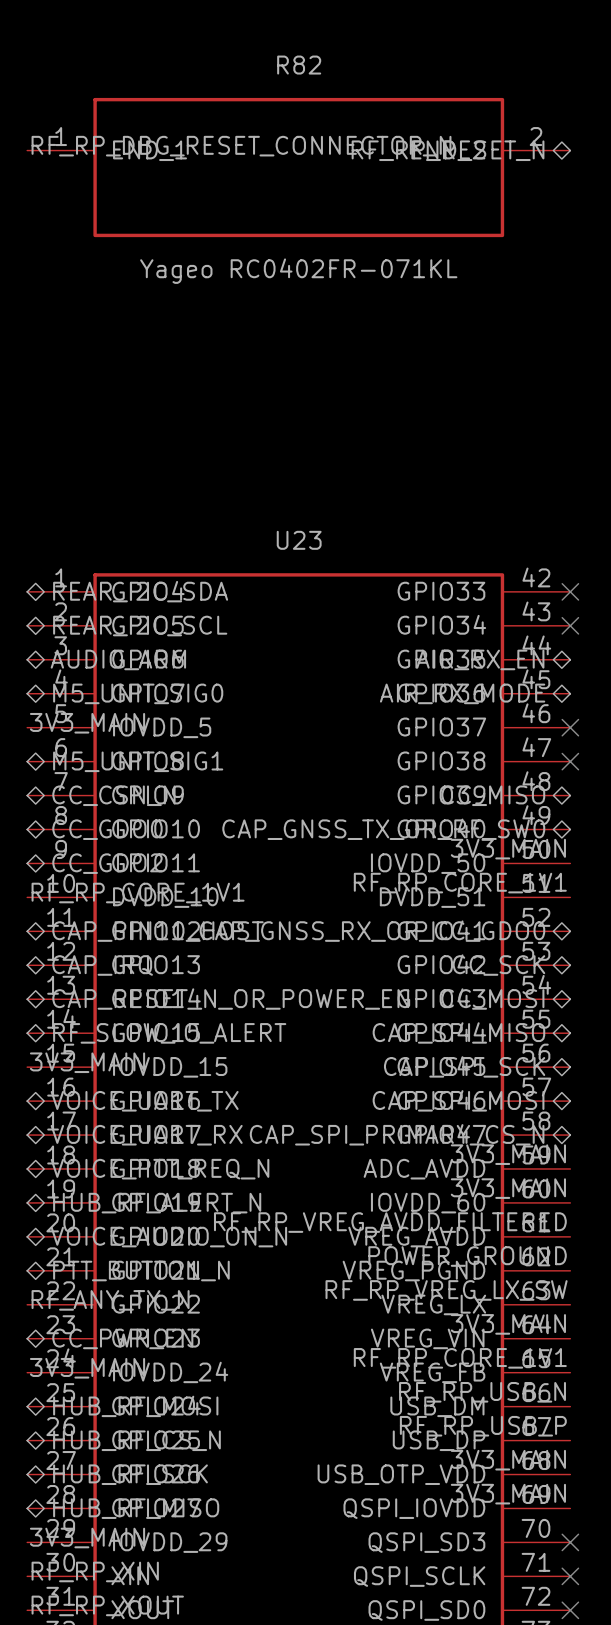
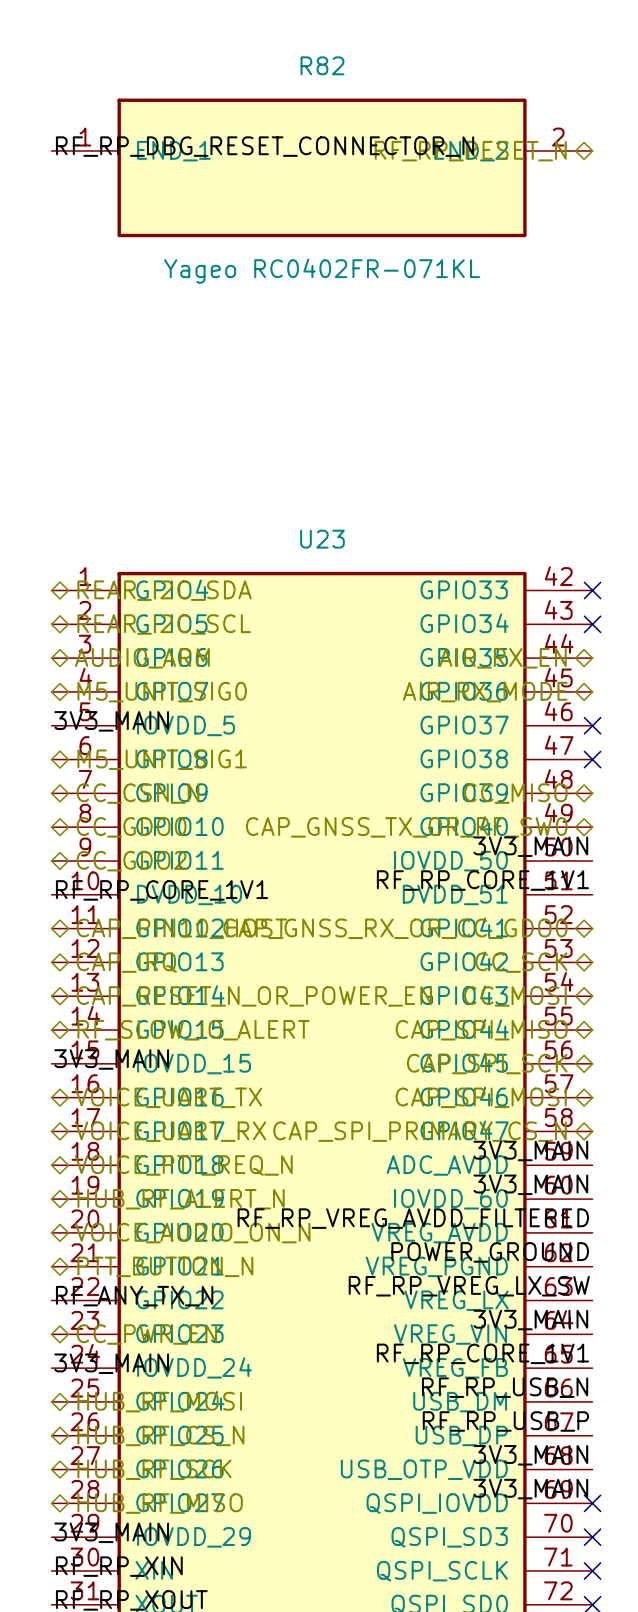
no-connect mark: none -> (592, 1503)

